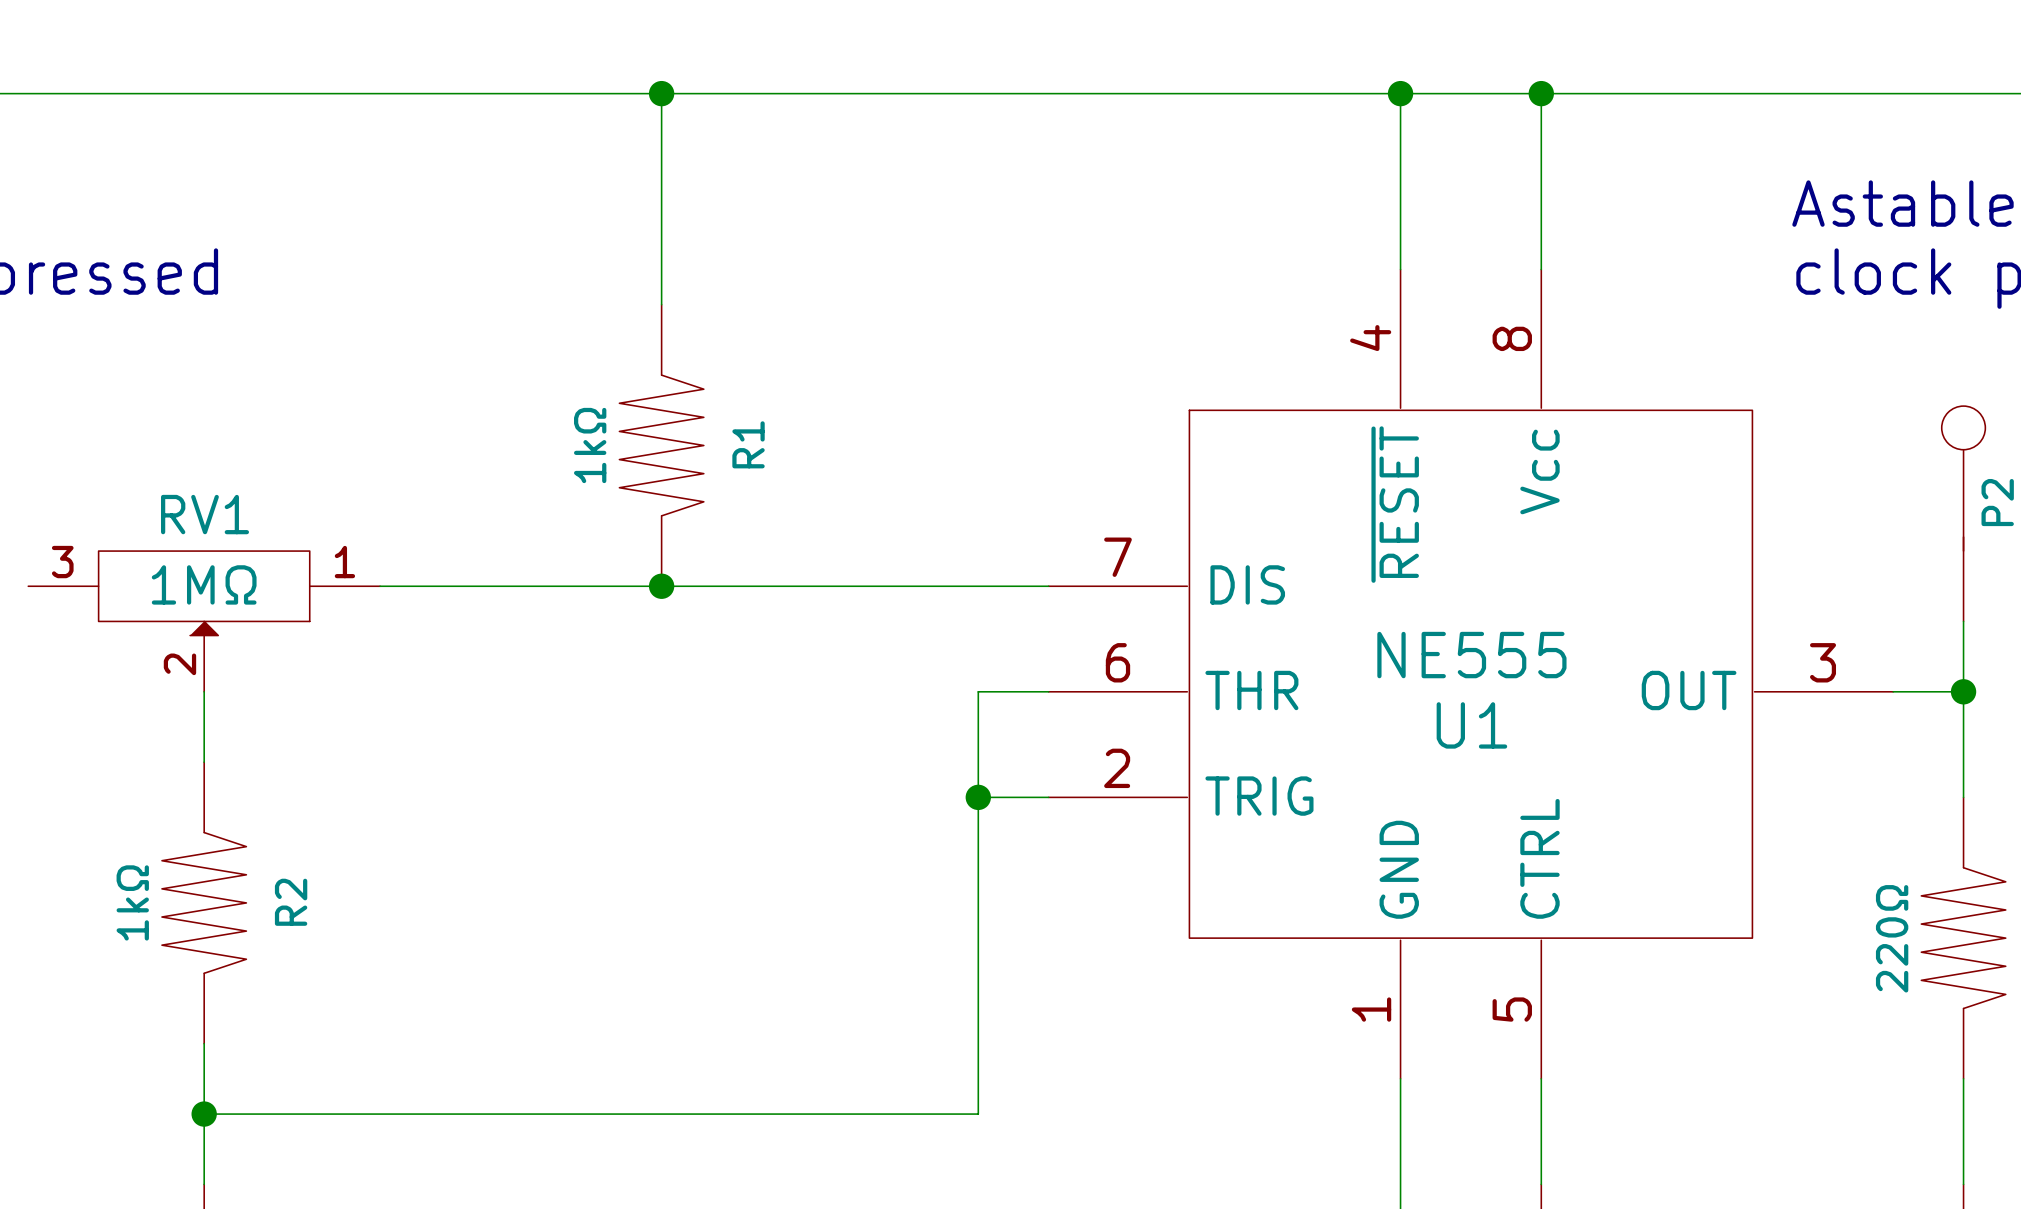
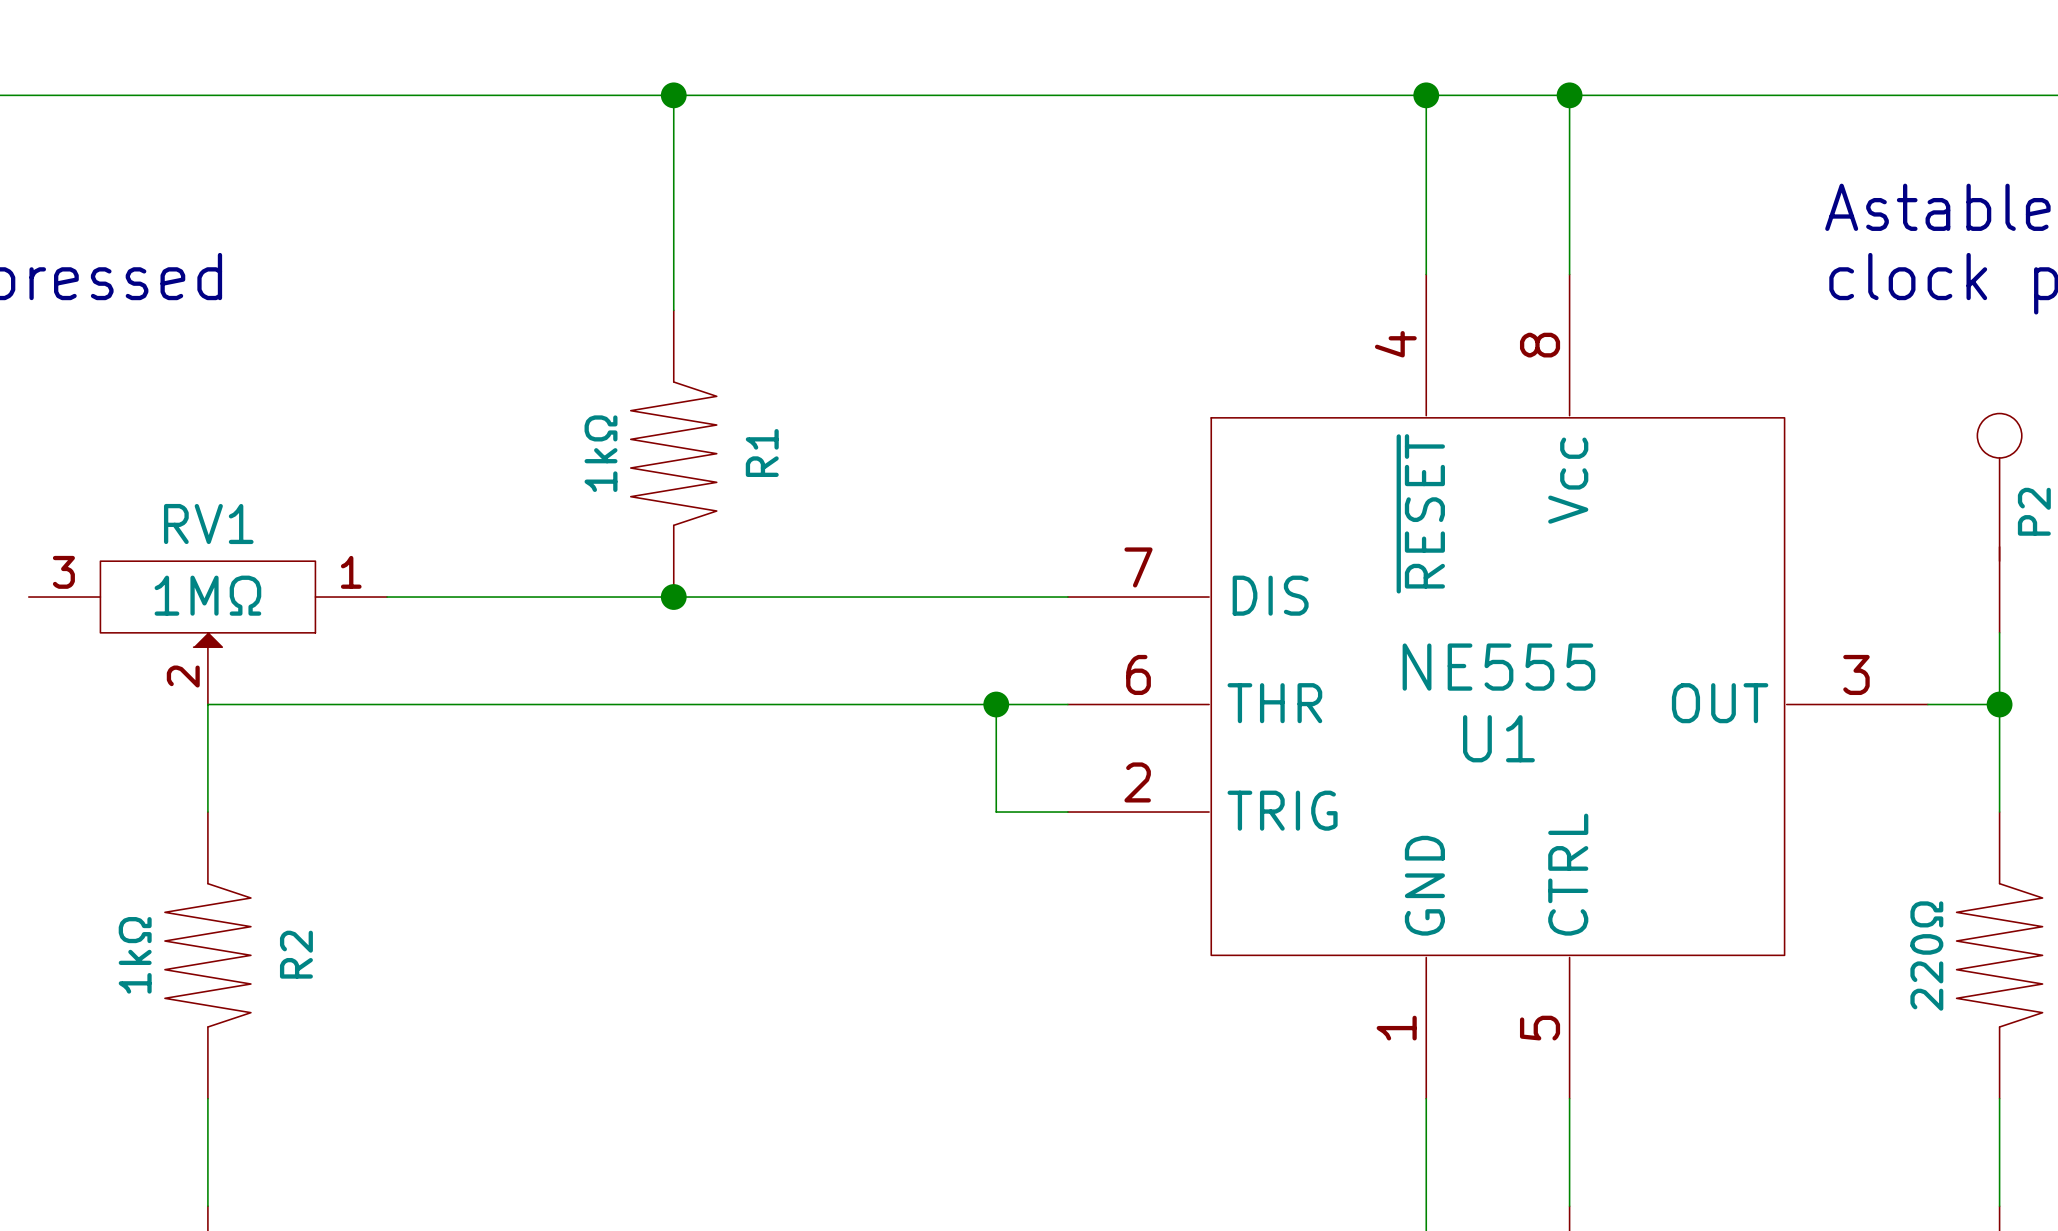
wire: none -> (207, 704) (996, 704)
wire: (978, 797) (978, 1114) (204, 1114) -> none
junction position: (978, 797) -> (996, 704)
R2 position: (204, 902) -> (207, 955)
junction: (204, 1114) -> none

